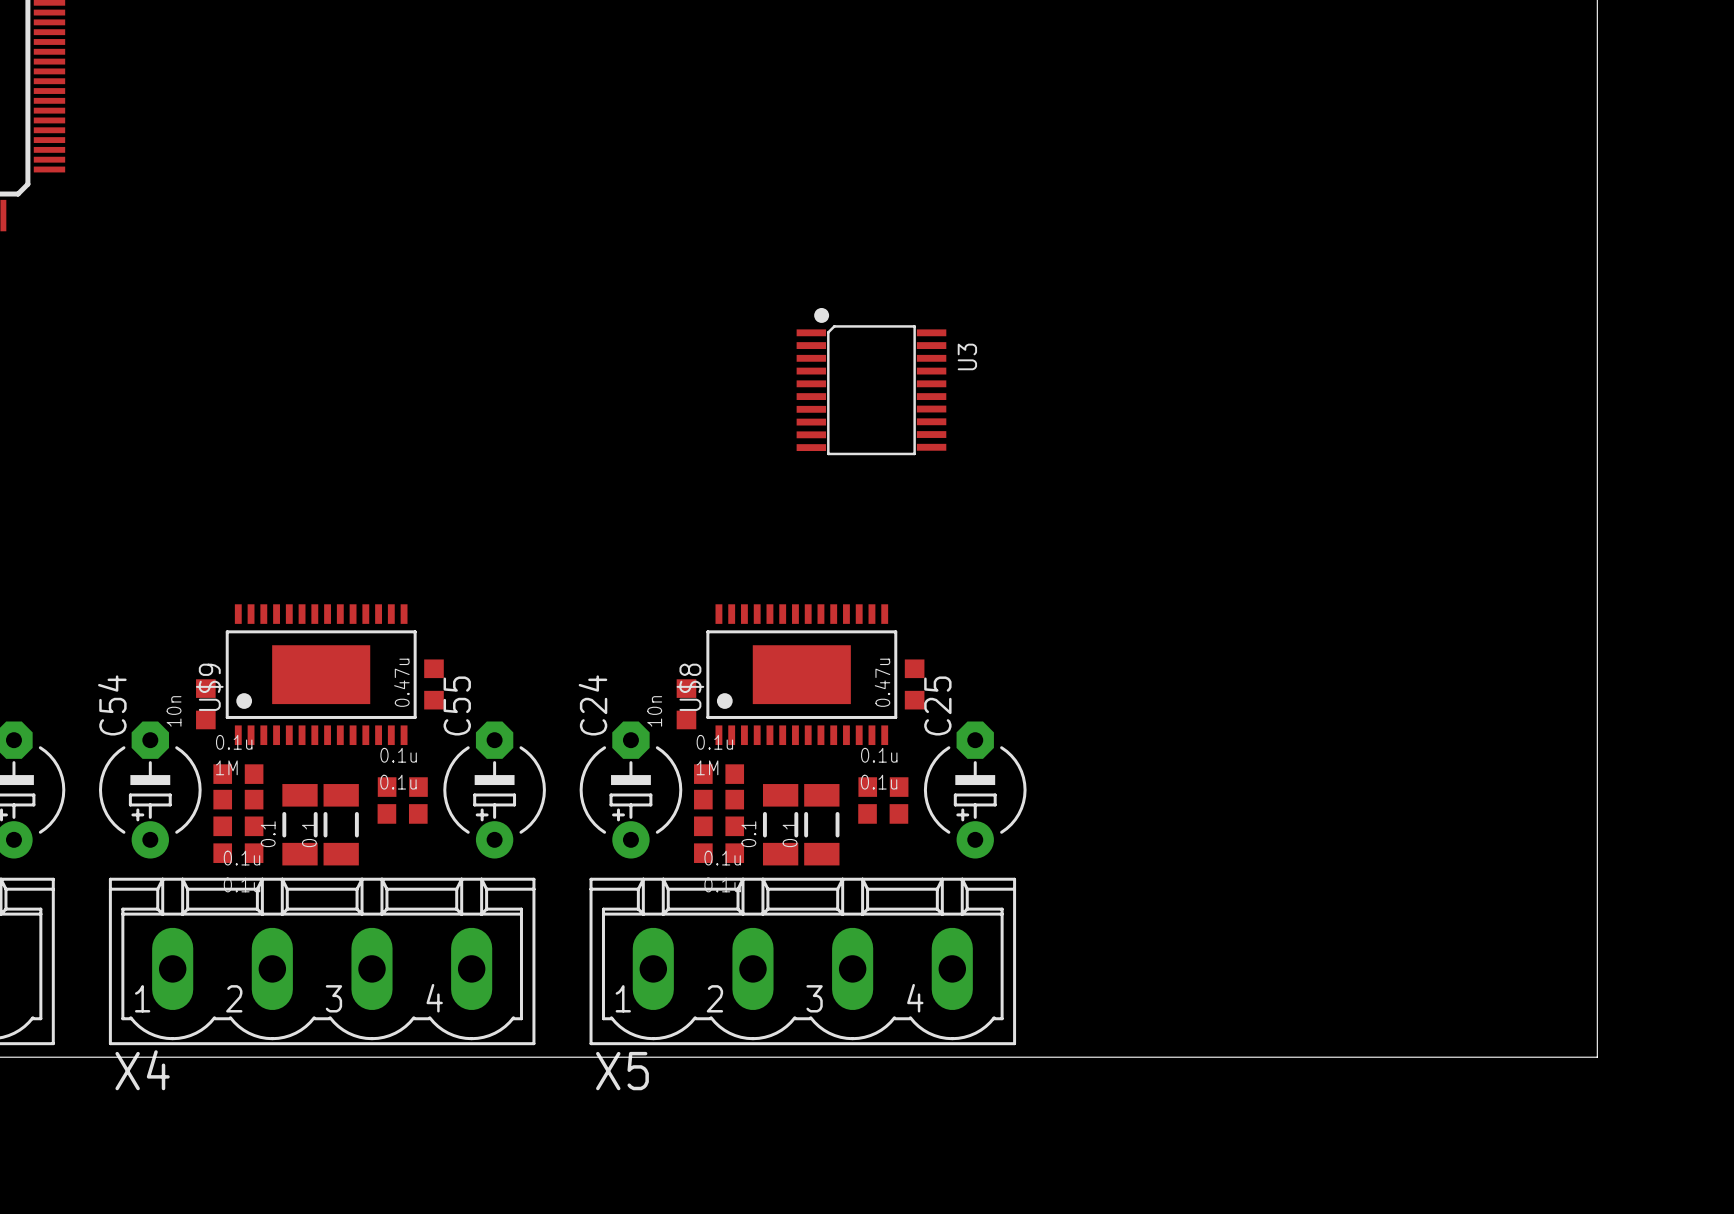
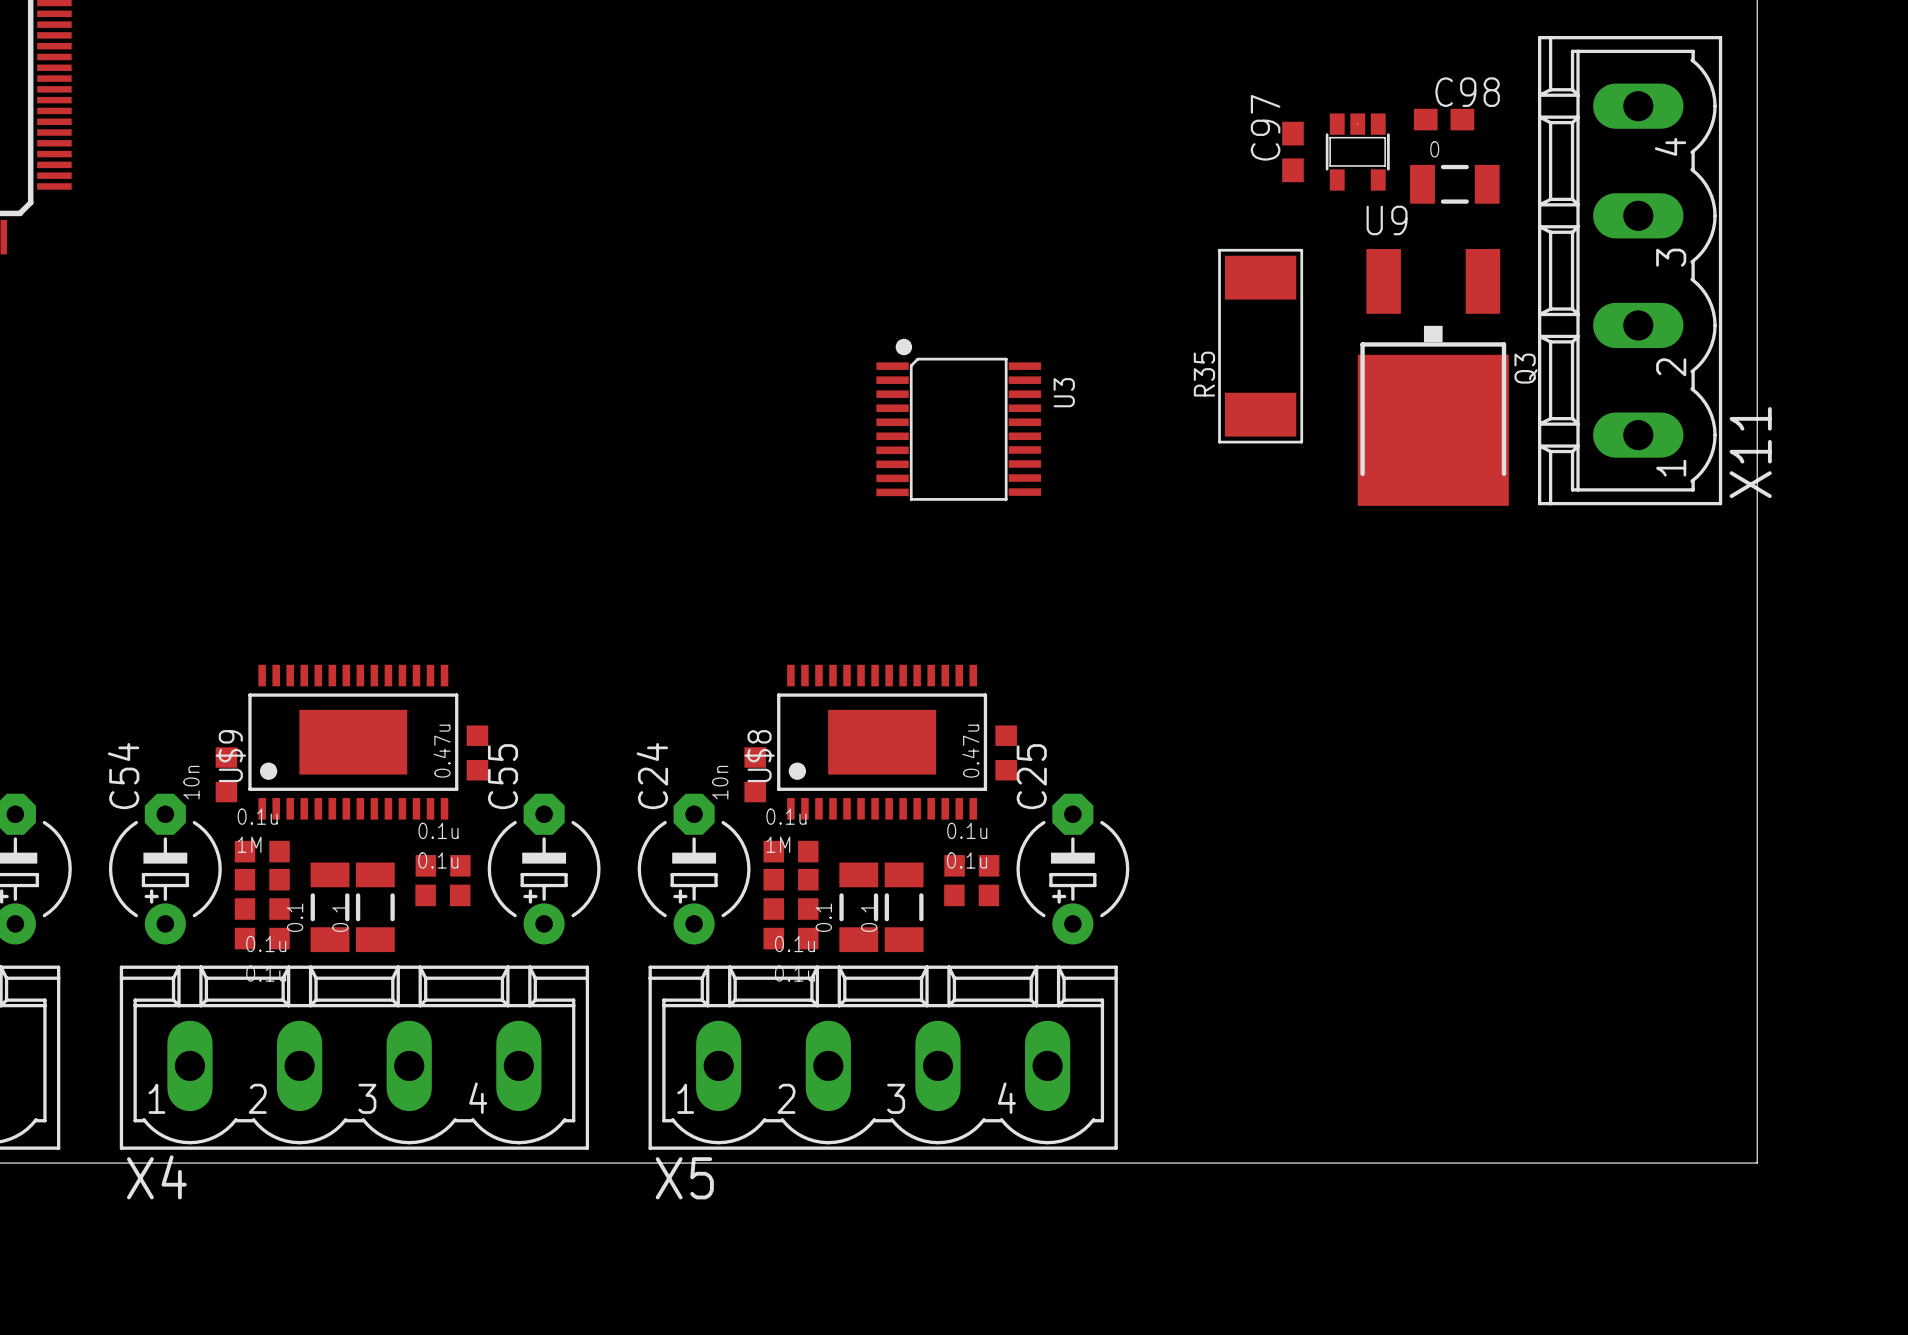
C98: none -> (1444, 119)
C97: none -> (1293, 151)
U9: none -> (1357, 152)
part: none -> 0 (1454, 184)
X11: none -> (1630, 270)
R35: none -> (1260, 346)
Q3: none -> (1433, 377)

